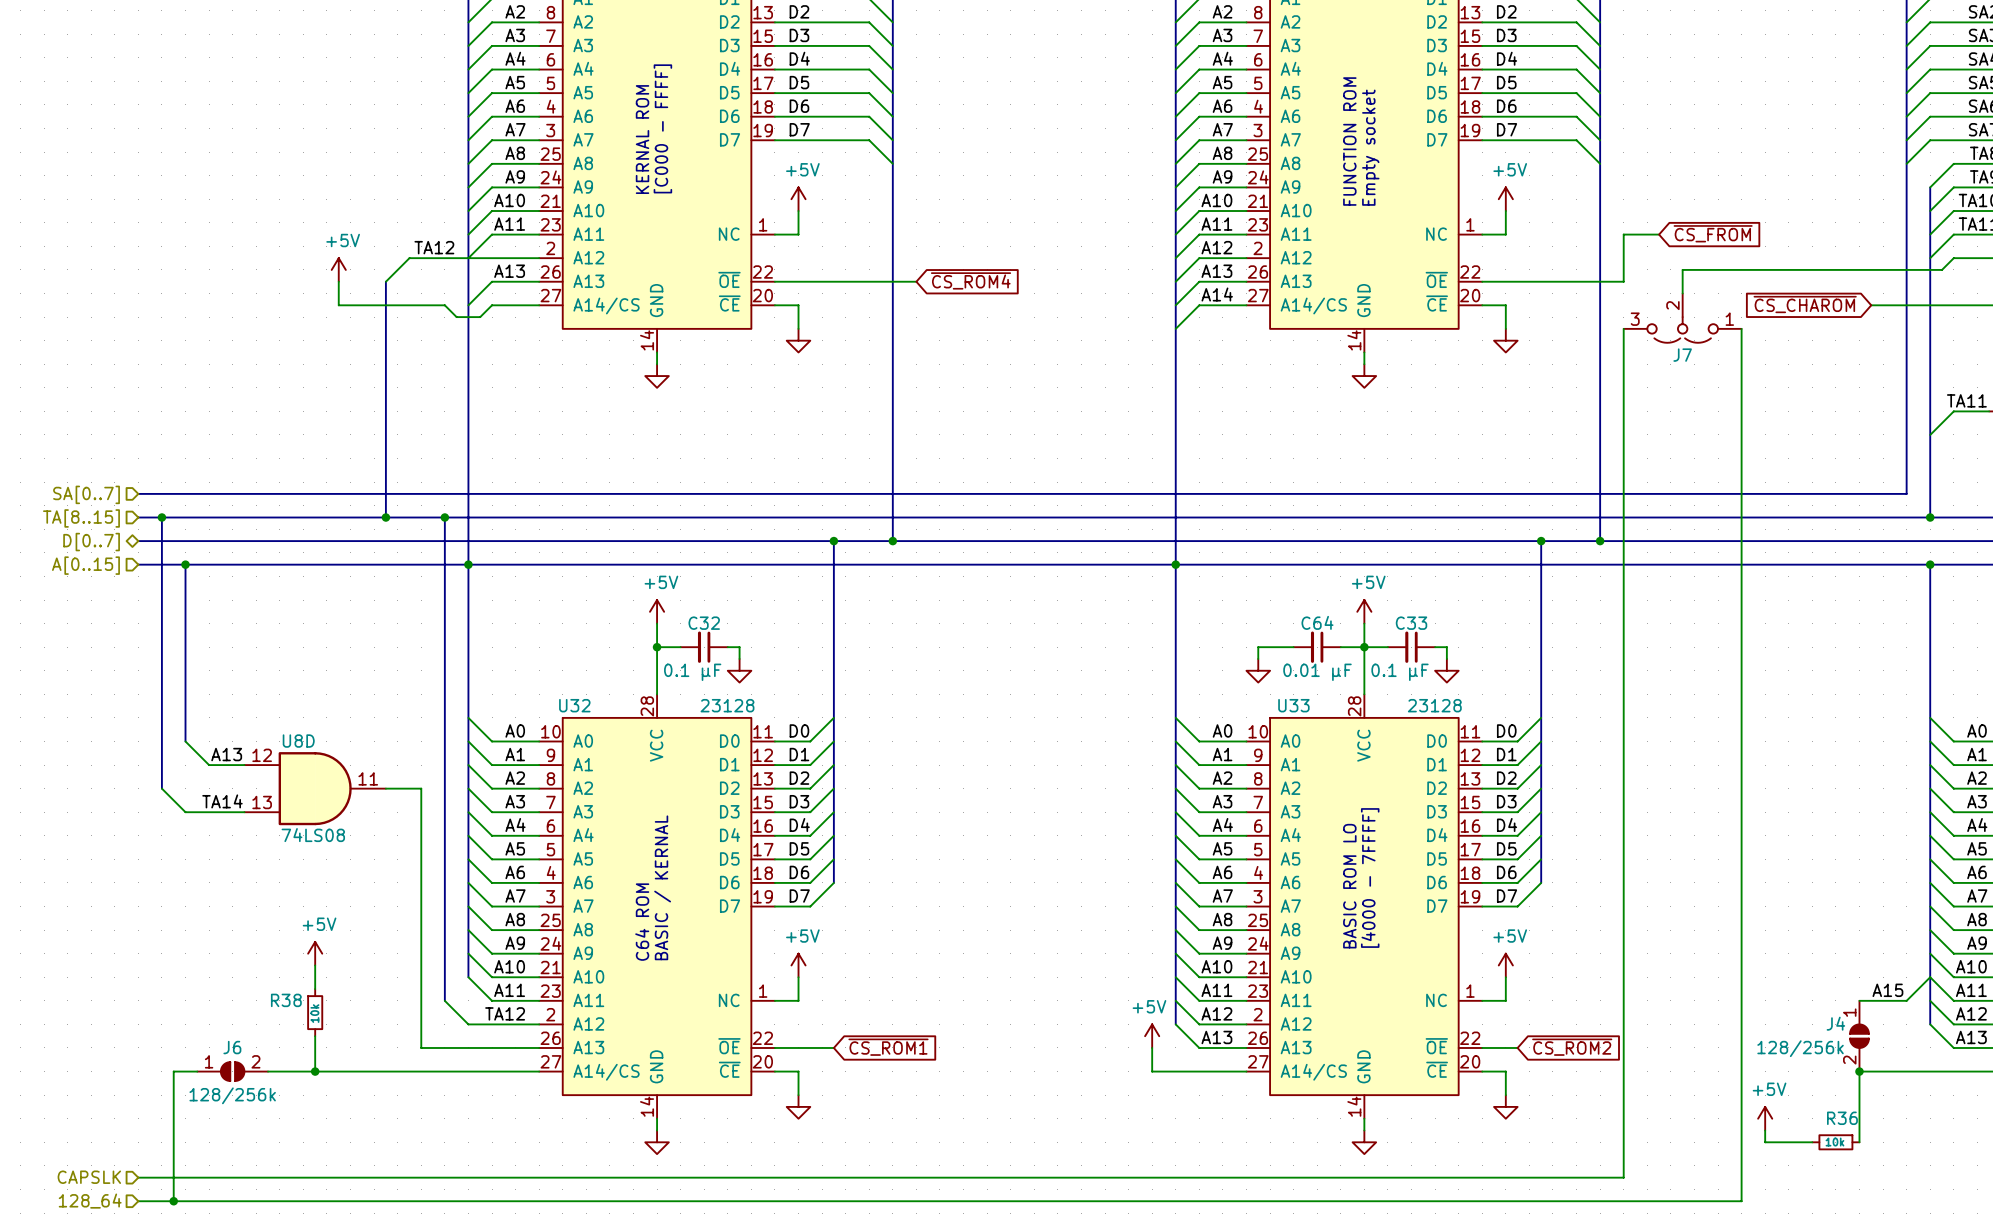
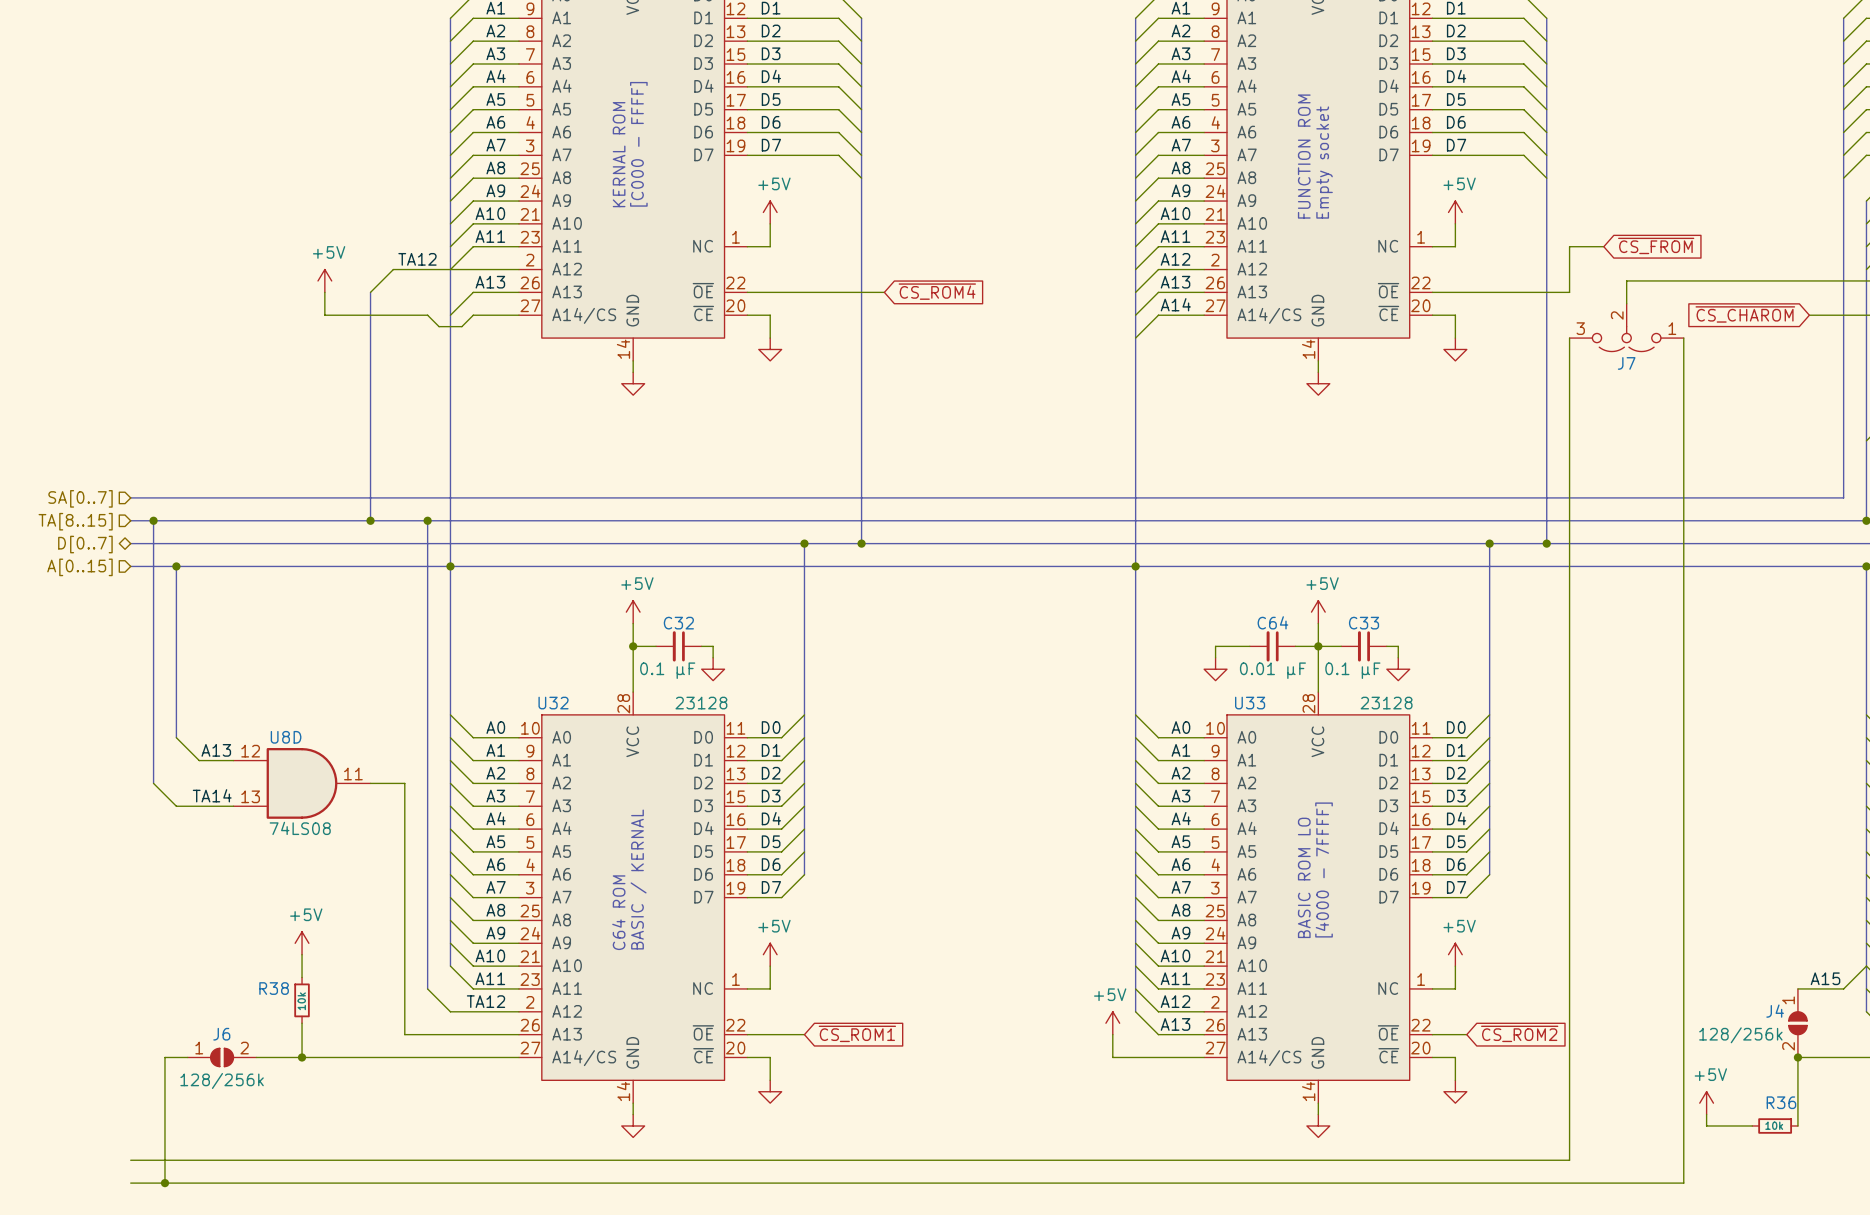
hierarchical label: CAPSLK (89, 1177) -> none
hierarchical label: 128_64 (90, 1201) -> none

